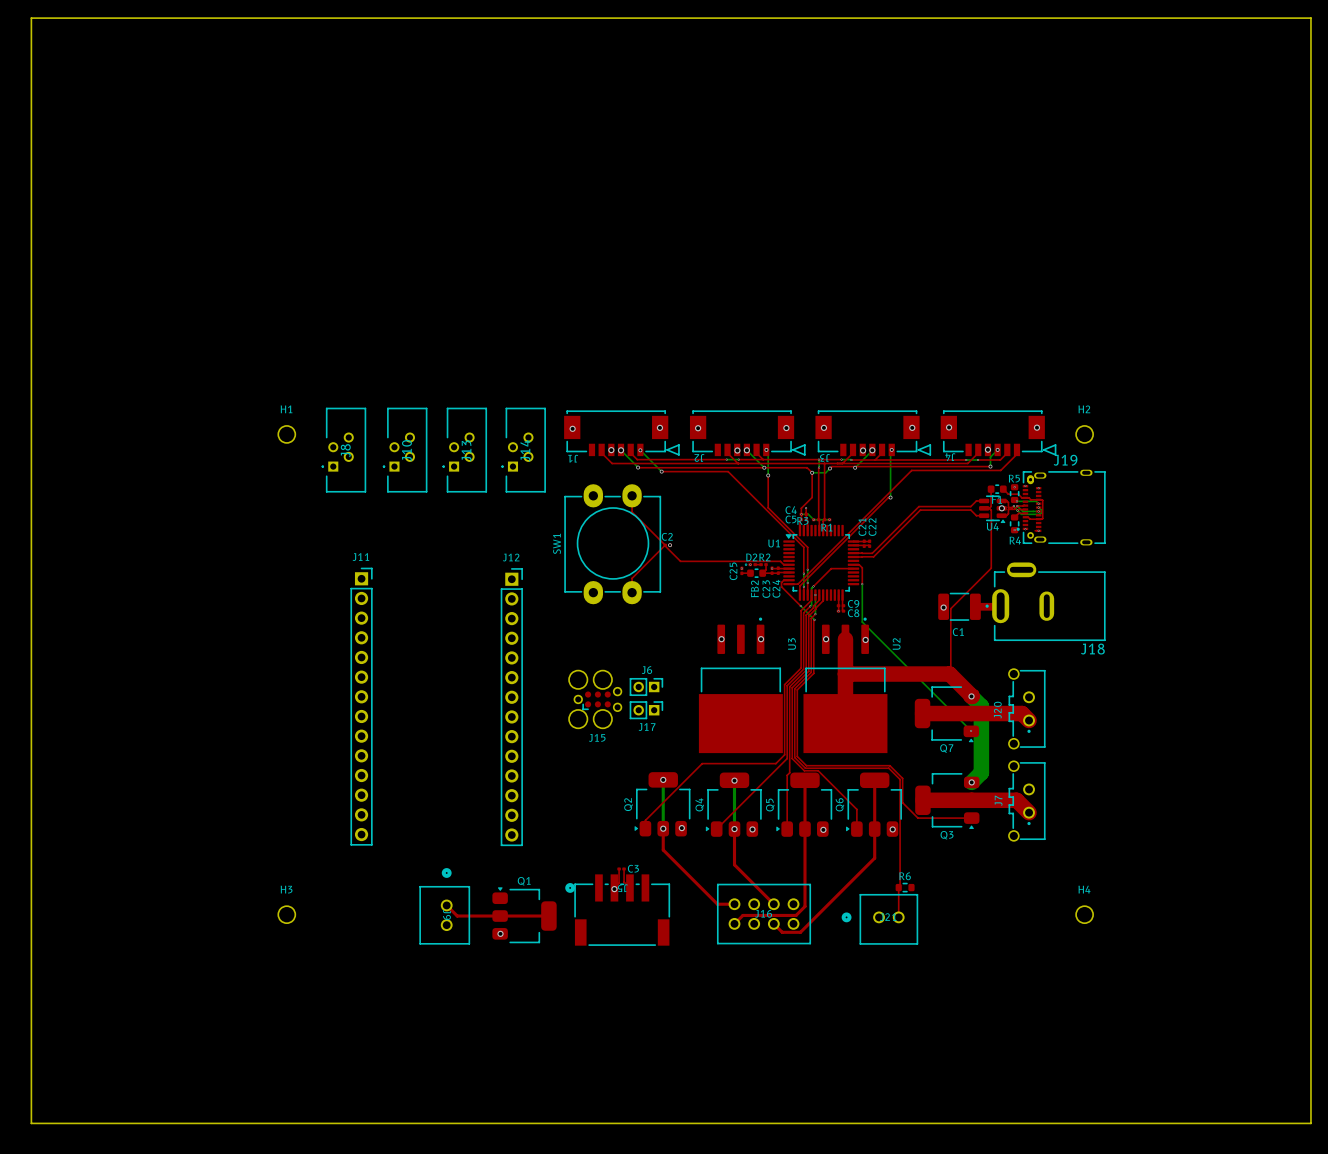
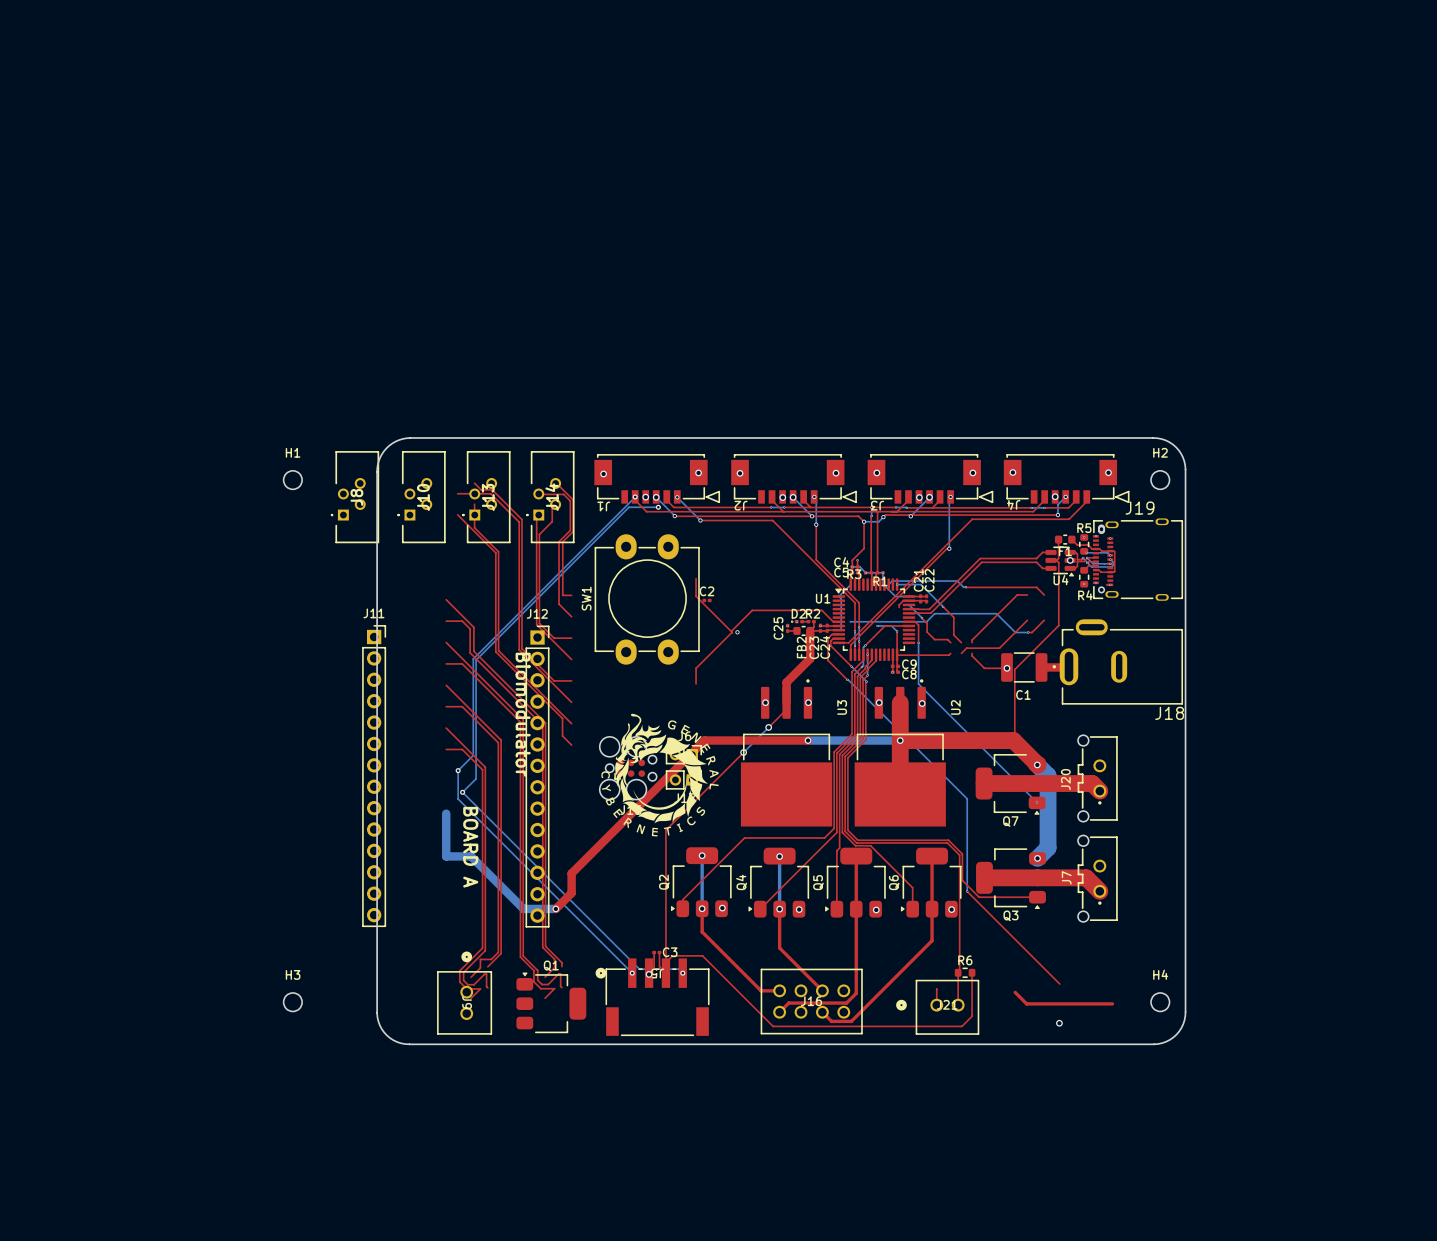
board edge: (31, 18) (1310, 18) (1310, 1123) (31, 1123) (31, 18) -> none
board edge: none -> (410, 437) (1153, 437) (1165, 440) (1172, 444) (1182, 457) (1185, 469) (1185, 1011) (1184, 1020) (1179, 1031) (1166, 1041) (1154, 1044) (409, 1044) (401, 1043) (389, 1038) (379, 1025) (377, 1012) (377, 472) (380, 457) (386, 448) (399, 440) (410, 437)
top track: none -> (474, 483) (481, 489) (492, 489) (521, 519) (521, 648) (554, 680) (571, 680)
top track: none -> (552, 483) (557, 483) (573, 499) (573, 531) (562, 541) (562, 595) (571, 595)
top track: none -> (457, 493) (490, 493) (519, 522) (519, 649) (571, 702)
top track: none -> (536, 495) (535, 494) (563, 494) (570, 501) (570, 530) (559, 541) (559, 604) (571, 616)
bottom track: none -> (635, 496) (473, 659) (473, 755) (458, 770) (458, 799) (632, 973)
via: none -> (635, 496)
top track: none -> (474, 504) (474, 527) (498, 551) (498, 650) (571, 723)
top track: none -> (552, 504) (552, 521) (539, 534) (539, 623) (554, 638) (571, 638)
bottom track: none -> (658, 507) (628, 507) (476, 660) (476, 778) (462, 792) (639, 969) (678, 969) (682, 973)
via: none -> (658, 507)
top track: none -> (457, 514) (495, 552) (495, 651) (562, 718) (562, 736) (571, 745)
top track: none -> (535, 515) (536, 624) (571, 659)
J19 footprint: [1016, 469, 1106, 546] -> [1093, 518, 1183, 601]
top track: (632, 495) (632, 512) (665, 545) -> none
bottom track: none -> (882, 572) (882, 583) (895, 596) (909, 596)
top track: none -> (696, 578) (696, 596) (732, 632) (696, 668) (696, 683)
bottom track: none -> (850, 584) (838, 596)
bottom track: none -> (888, 584) (892, 581) (957, 581) (965, 587)
bottom track: none -> (897, 584) (921, 584) (943, 606)
via: none -> (897, 584)
top track: none -> (965, 587) (1036, 587) (1044, 595)
via: none -> (965, 587)
top track: none -> (1027, 595) (1017, 595) (972, 640) (972, 642)
bottom track: none -> (838, 596) (841, 598) (841, 630)
top track: none -> (446, 599) (473, 627) (473, 651) (545, 722) (545, 946) (561, 962) (561, 966)
top track: (665, 545) (680, 561) (780, 561) -> (732, 633) (732, 630) (752, 610) (821, 610) (829, 618)
top track: (665, 545) (632, 578) (632, 592) -> none
via position: (670, 545) -> (737, 632)
top track: none -> (909, 600) (903, 600) (899, 607)
bottom track: none -> (909, 604) (921, 618)
top track: none -> (943, 606) (953, 617) (953, 635) (961, 642)
via: none -> (943, 606)
top track: none -> (921, 618) (927, 623) (927, 632) (934, 639) (947, 639) (950, 642)
via: none -> (921, 618)
top track: none -> (1027, 620) (999, 648) (966, 648) (961, 653)
top track: none -> (1044, 620) (1032, 632) (1028, 632)
top track: none -> (446, 621) (462, 621) (470, 629) (470, 652) (542, 725) (542, 947) (554, 959) (554, 967) (545, 977)
bottom track: none -> (850, 621) (926, 621) (934, 613) (996, 613) (1015, 632) (1028, 632)
bottom track: none -> (877, 625) (891, 625) (897, 631)
via: none -> (877, 625)
top track: none -> (810, 630) (810, 658) (786, 682) (786, 709) (768, 727)
top track: none -> (897, 631) (897, 655) (948, 655) (950, 653)
via: none -> (897, 631)
via: none -> (1028, 632)
top track: none -> (838, 634) (832, 634) (828, 638) (828, 660) (847, 679)
top track: none -> (446, 642) (523, 719) (523, 956) (537, 970) (537, 980) (542, 984) (548, 984) (560, 974) (561, 987)
top track: none -> (972, 653) (972, 655) (984, 668) (1007, 668)
top track: none -> (446, 663) (462, 663) (520, 722) (520, 957) (533, 970) (533, 981) (540, 988) (554, 988) (545, 998)
bottom track: none -> (847, 679) (967, 798) (967, 891)
via: none -> (847, 679)
top track: none -> (446, 685) (501, 740) (501, 953) (487, 966)
text: none -> Biomodulator (523, 714)
top track: none -> (446, 706) (462, 706) (498, 742) (498, 952) (491, 959) (480, 959) (480, 967) (470, 977)
drawing: none -> [601, 713, 719, 837]
bottom track: none -> (768, 727) (743, 752)
via: none -> (768, 727)
top track: none -> (446, 728) (485, 767) (485, 950) (463, 972) (463, 980) (467, 984) (474, 984) (486, 974) (487, 987)
top track: none -> (808, 740) (704, 740) (571, 873) (571, 893) (555, 908)
bottom track: none -> (808, 740) (900, 740)
via: none -> (808, 740)
via: none -> (900, 740)
top track: none -> (446, 749) (462, 749) (482, 769) (482, 948) (459, 970) (459, 981) (466, 988) (480, 988) (470, 998)
top track: none -> (743, 752) (665, 830) (665, 973)
via: none -> (743, 752)
via: none -> (458, 770)
via: none -> (462, 792)
bottom track: none -> (446, 813) (446, 856) (471, 856) (523, 908) (555, 908)
text: none -> BOARD A (470, 847)
top track: none -> (967, 891) (1059, 984)
via: none -> (967, 891)
via: none -> (555, 908)
top track: none -> (665, 962) (672, 955) (702, 955) (773, 1026) (961, 1026) (972, 1016) (972, 972)
via: none -> (632, 973)
via: none -> (682, 973)
top track: none -> (936, 989) (936, 1005)
top track: (446, 905) (457, 916) (548, 916) -> none
top track: none -> (1015, 992) (1026, 1003) (1112, 1003)
via: (500, 933) -> none
via: none -> (1059, 1023)

